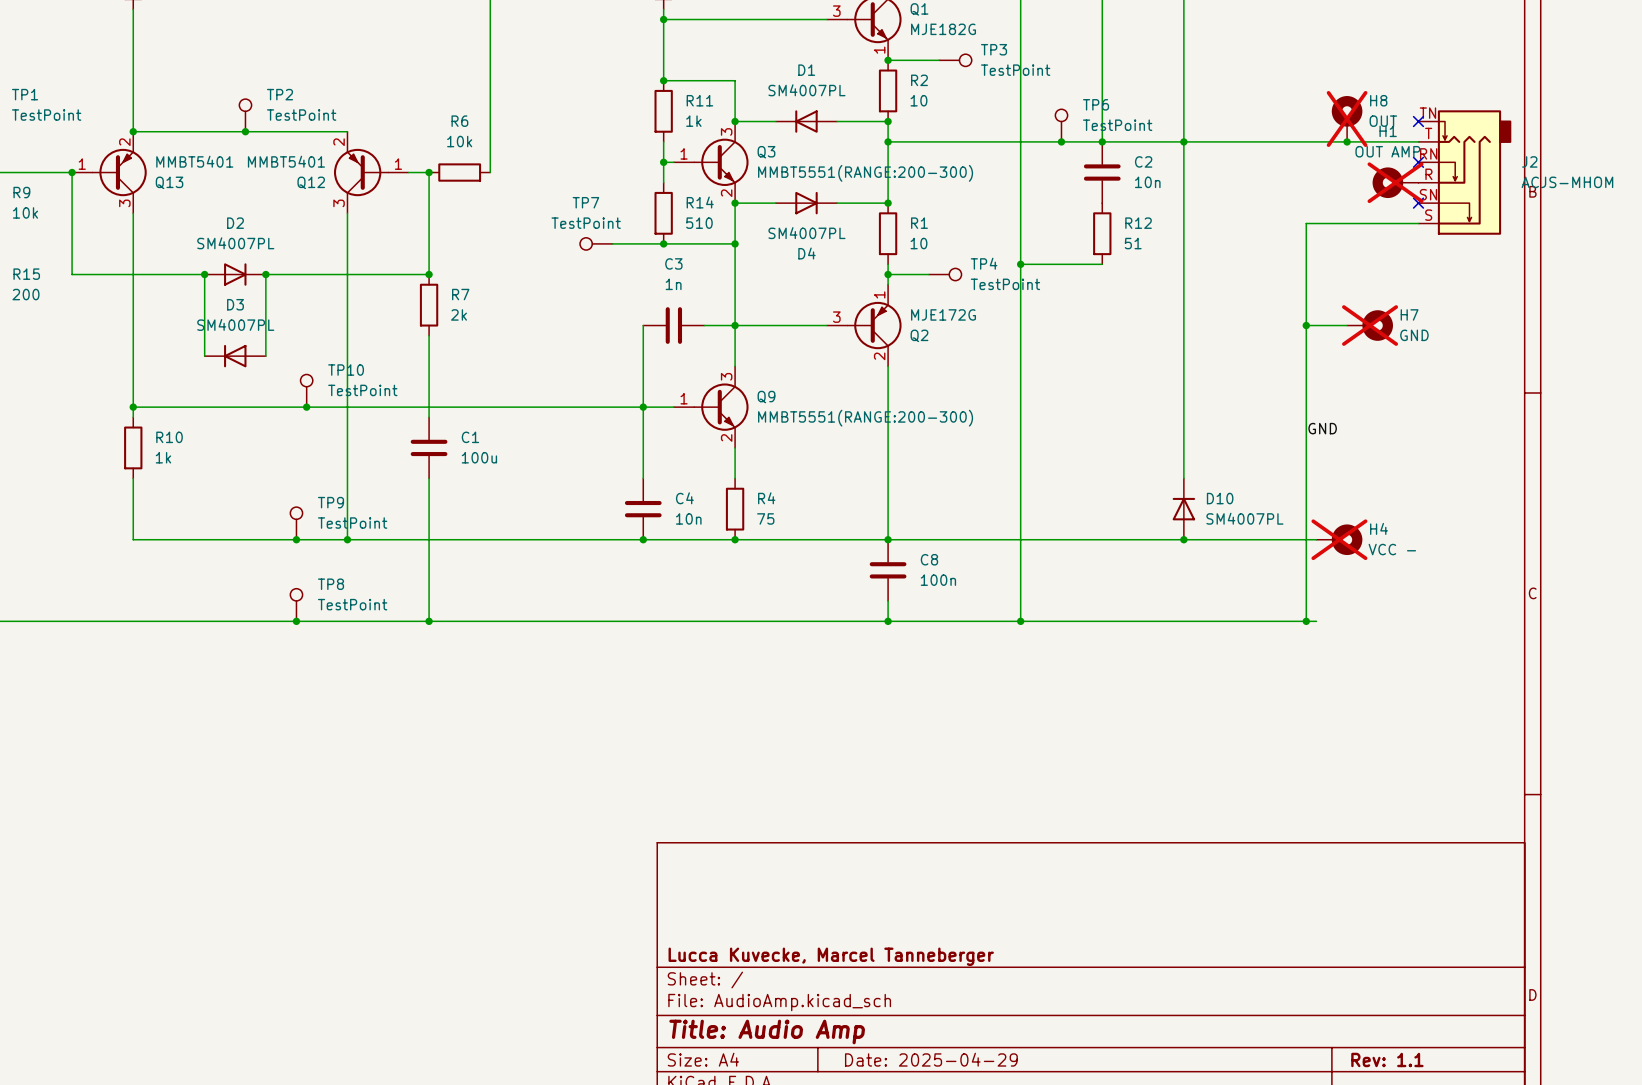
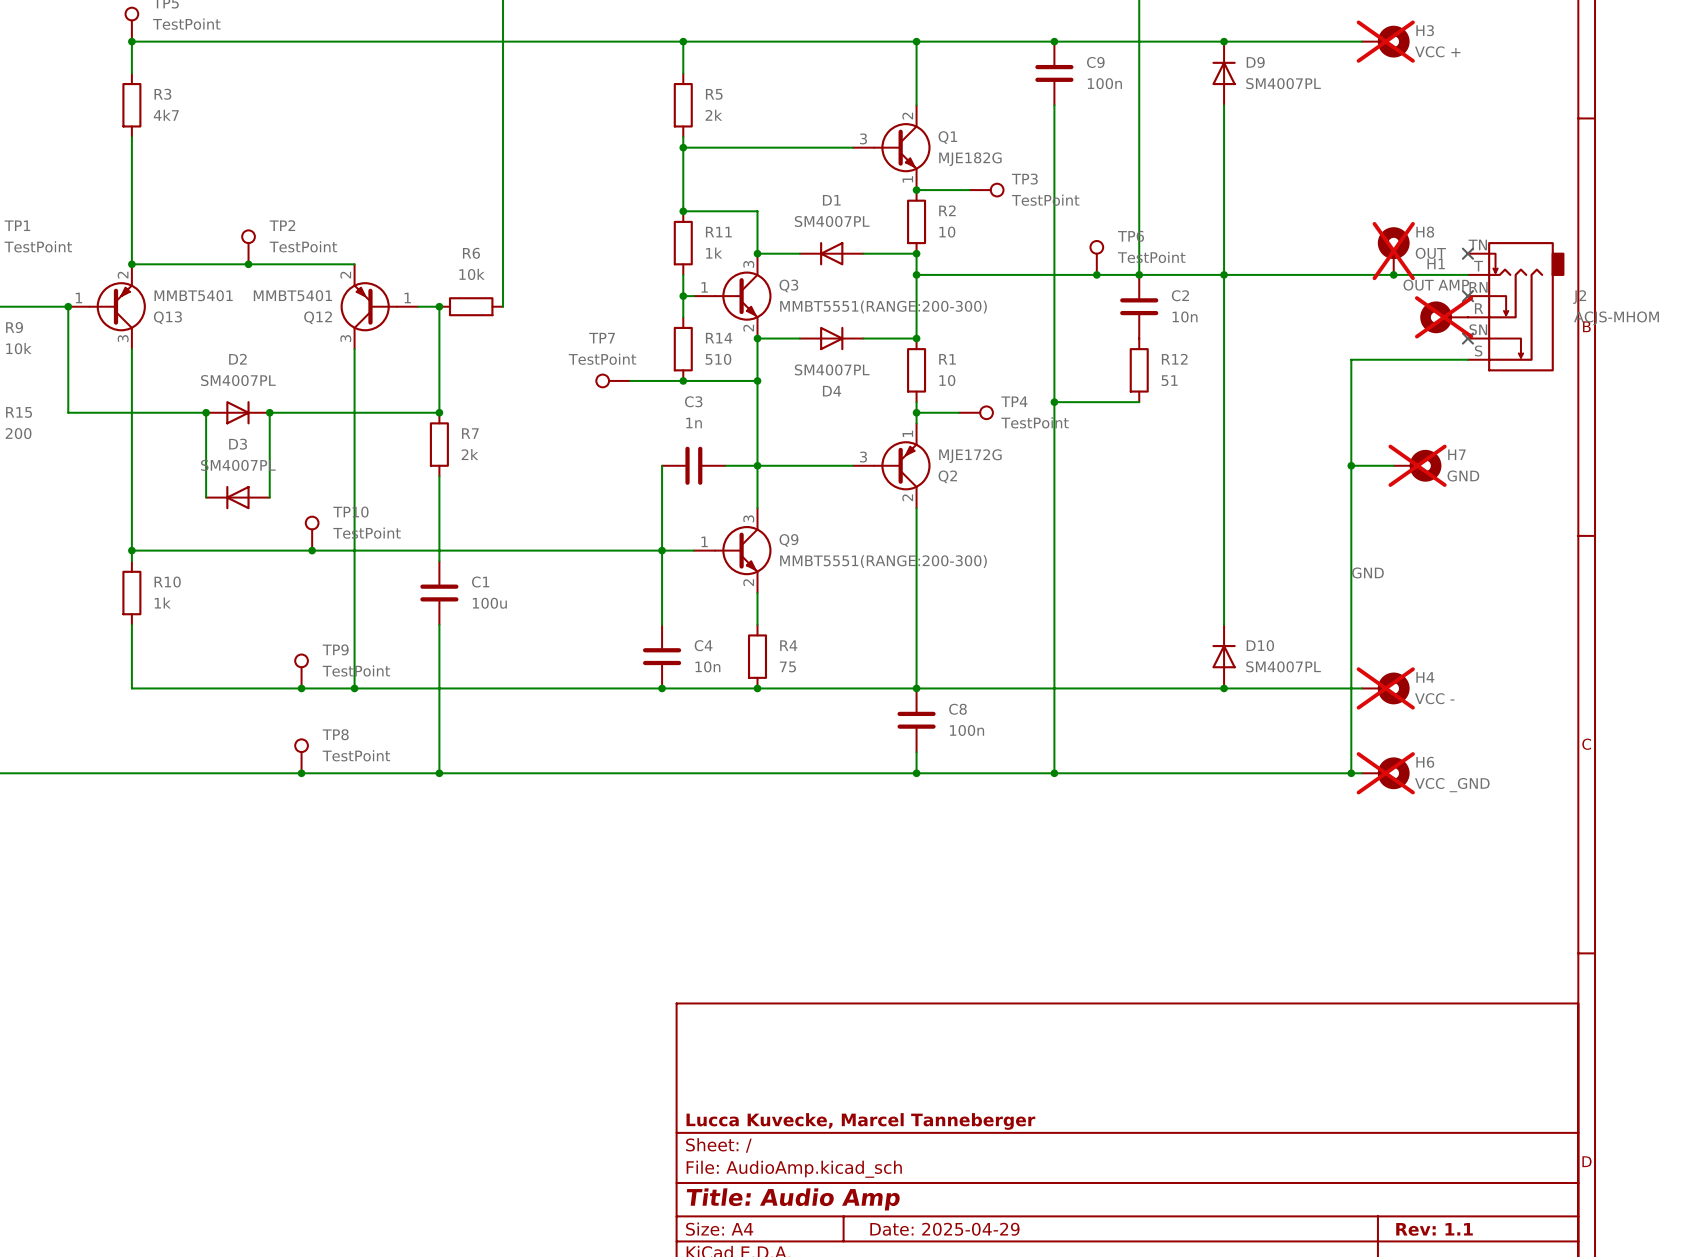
H6: none -> VCC _GND (1385, 773)

